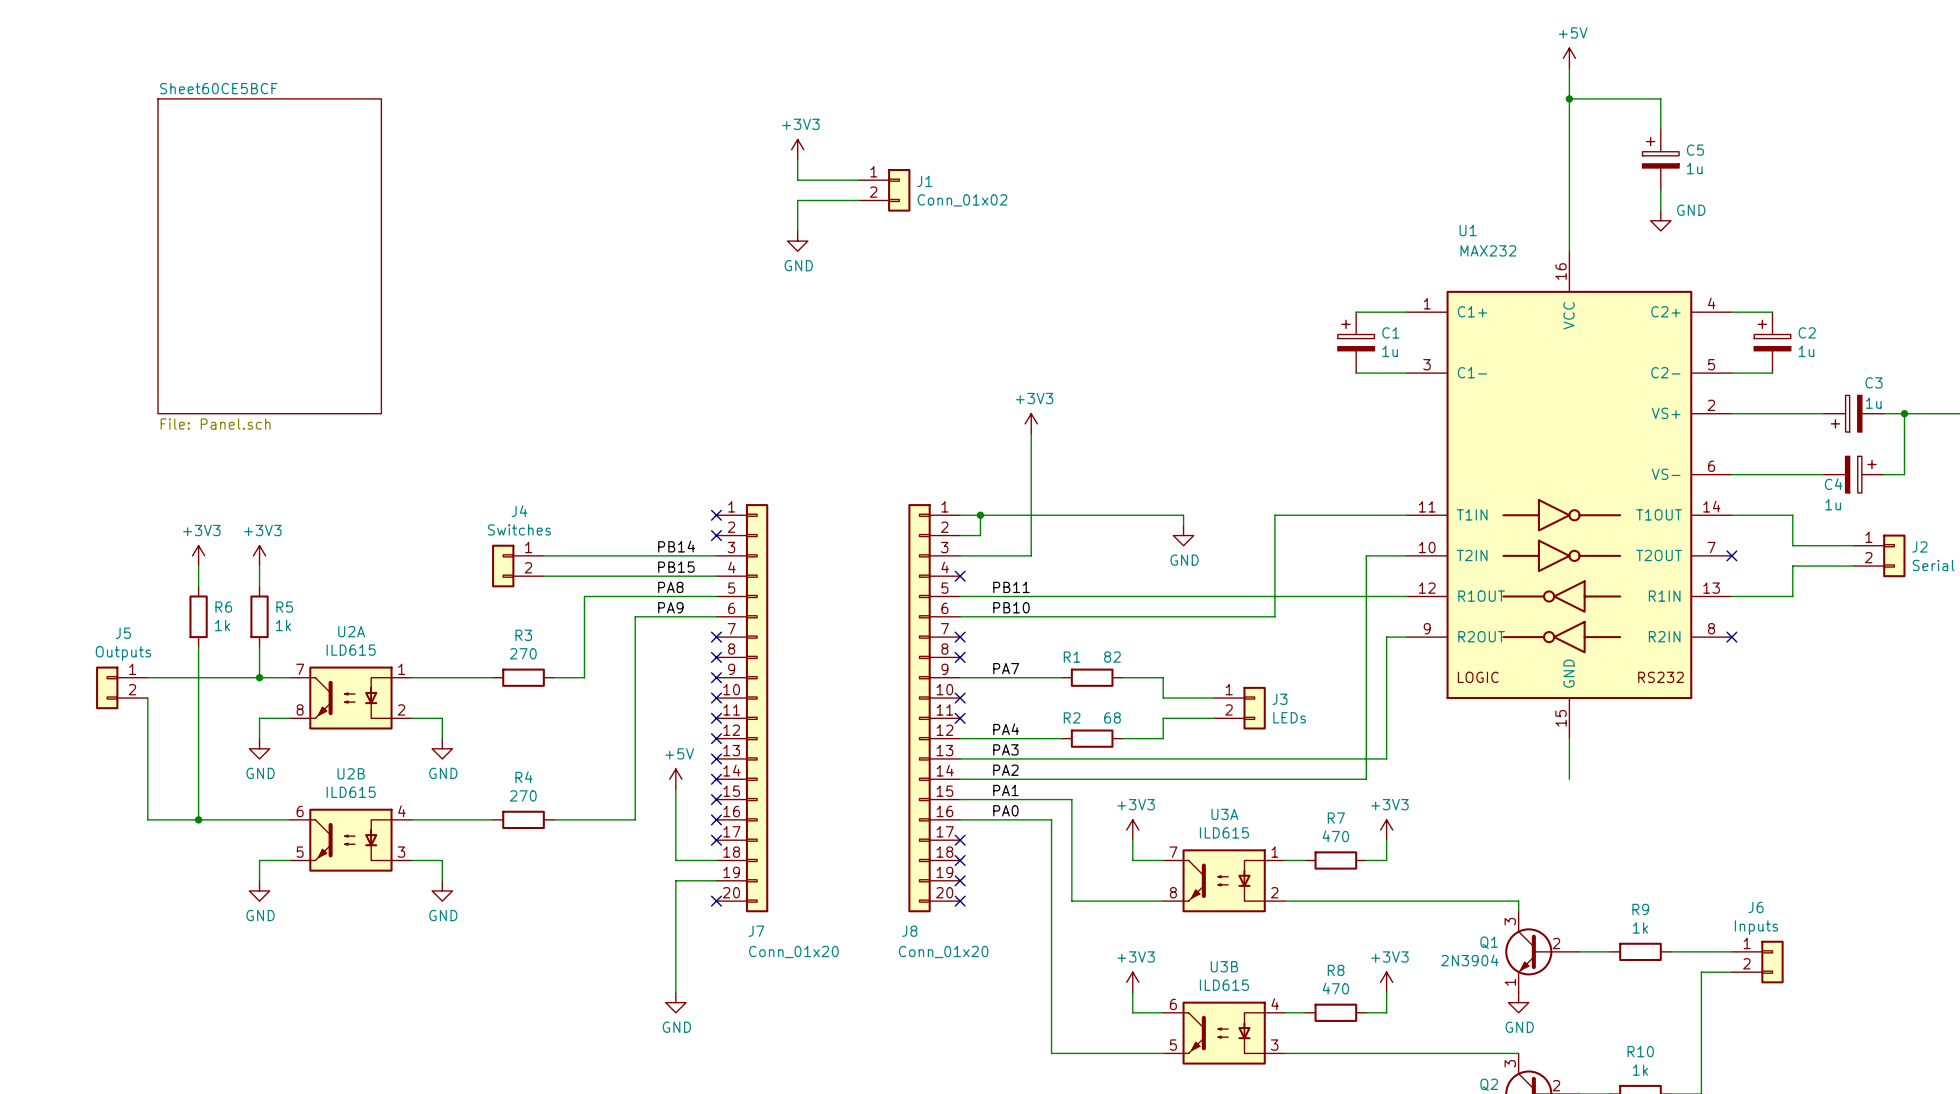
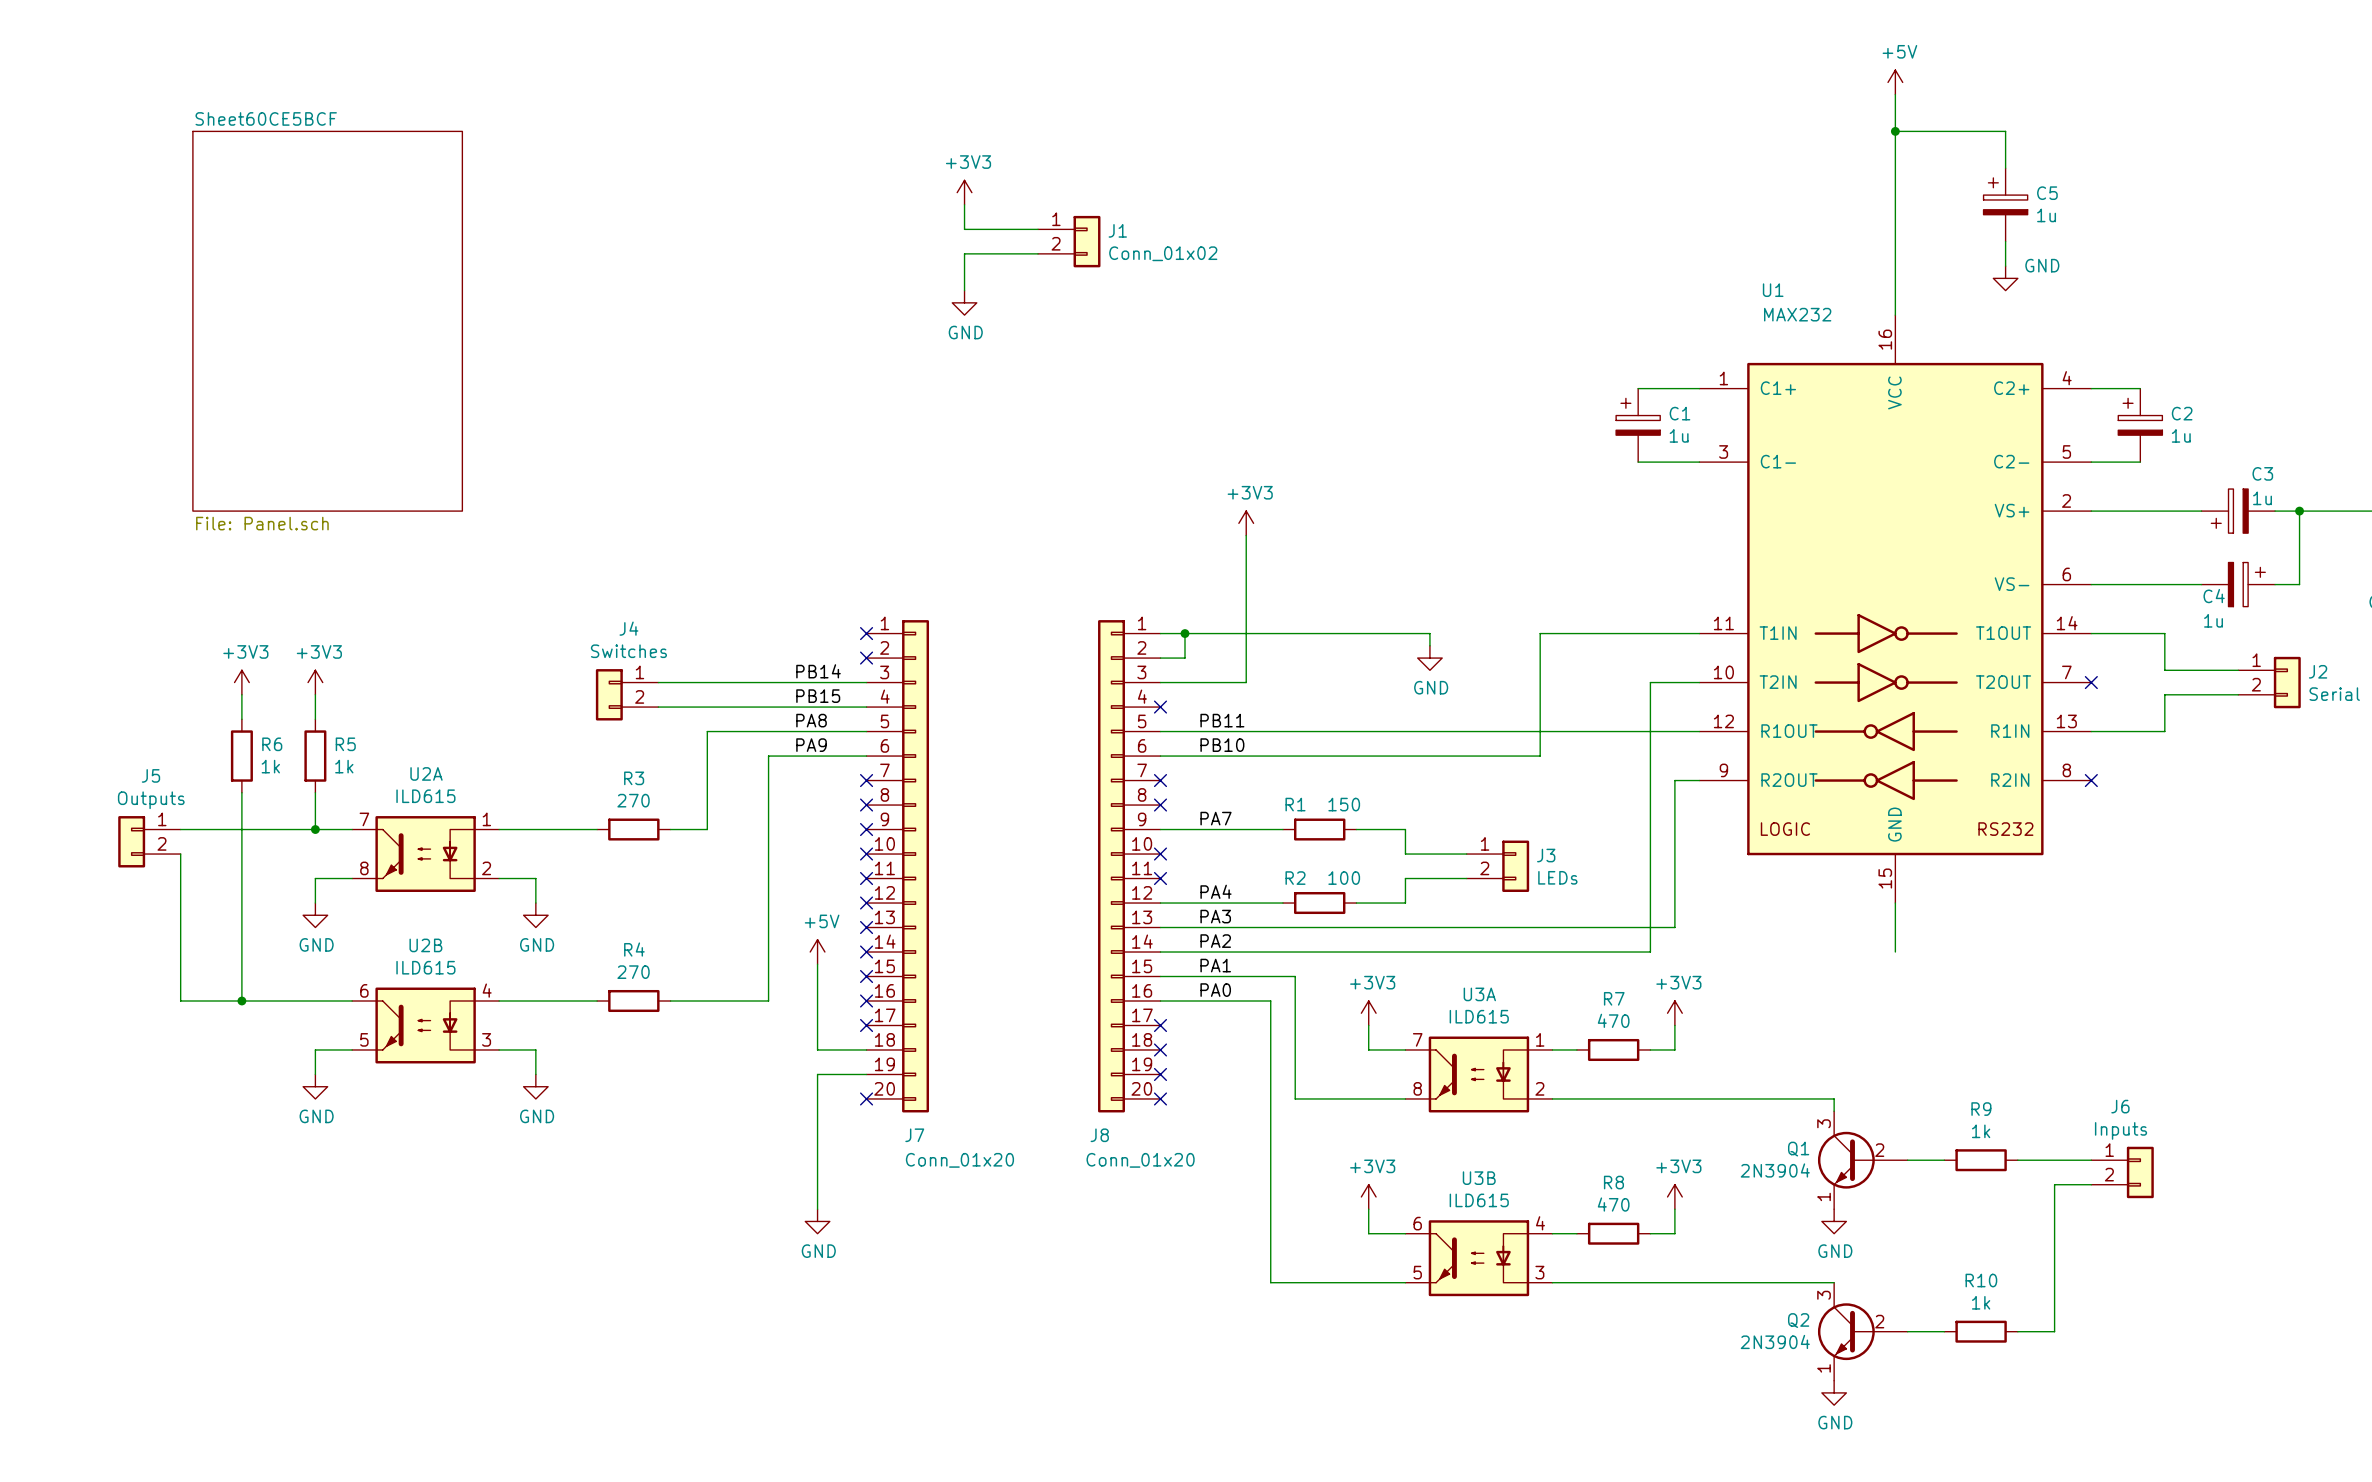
R1 value: 82 (1112, 657) -> 150 (1344, 804)
R2 value: 68 (1112, 717) -> 100 (1344, 878)

